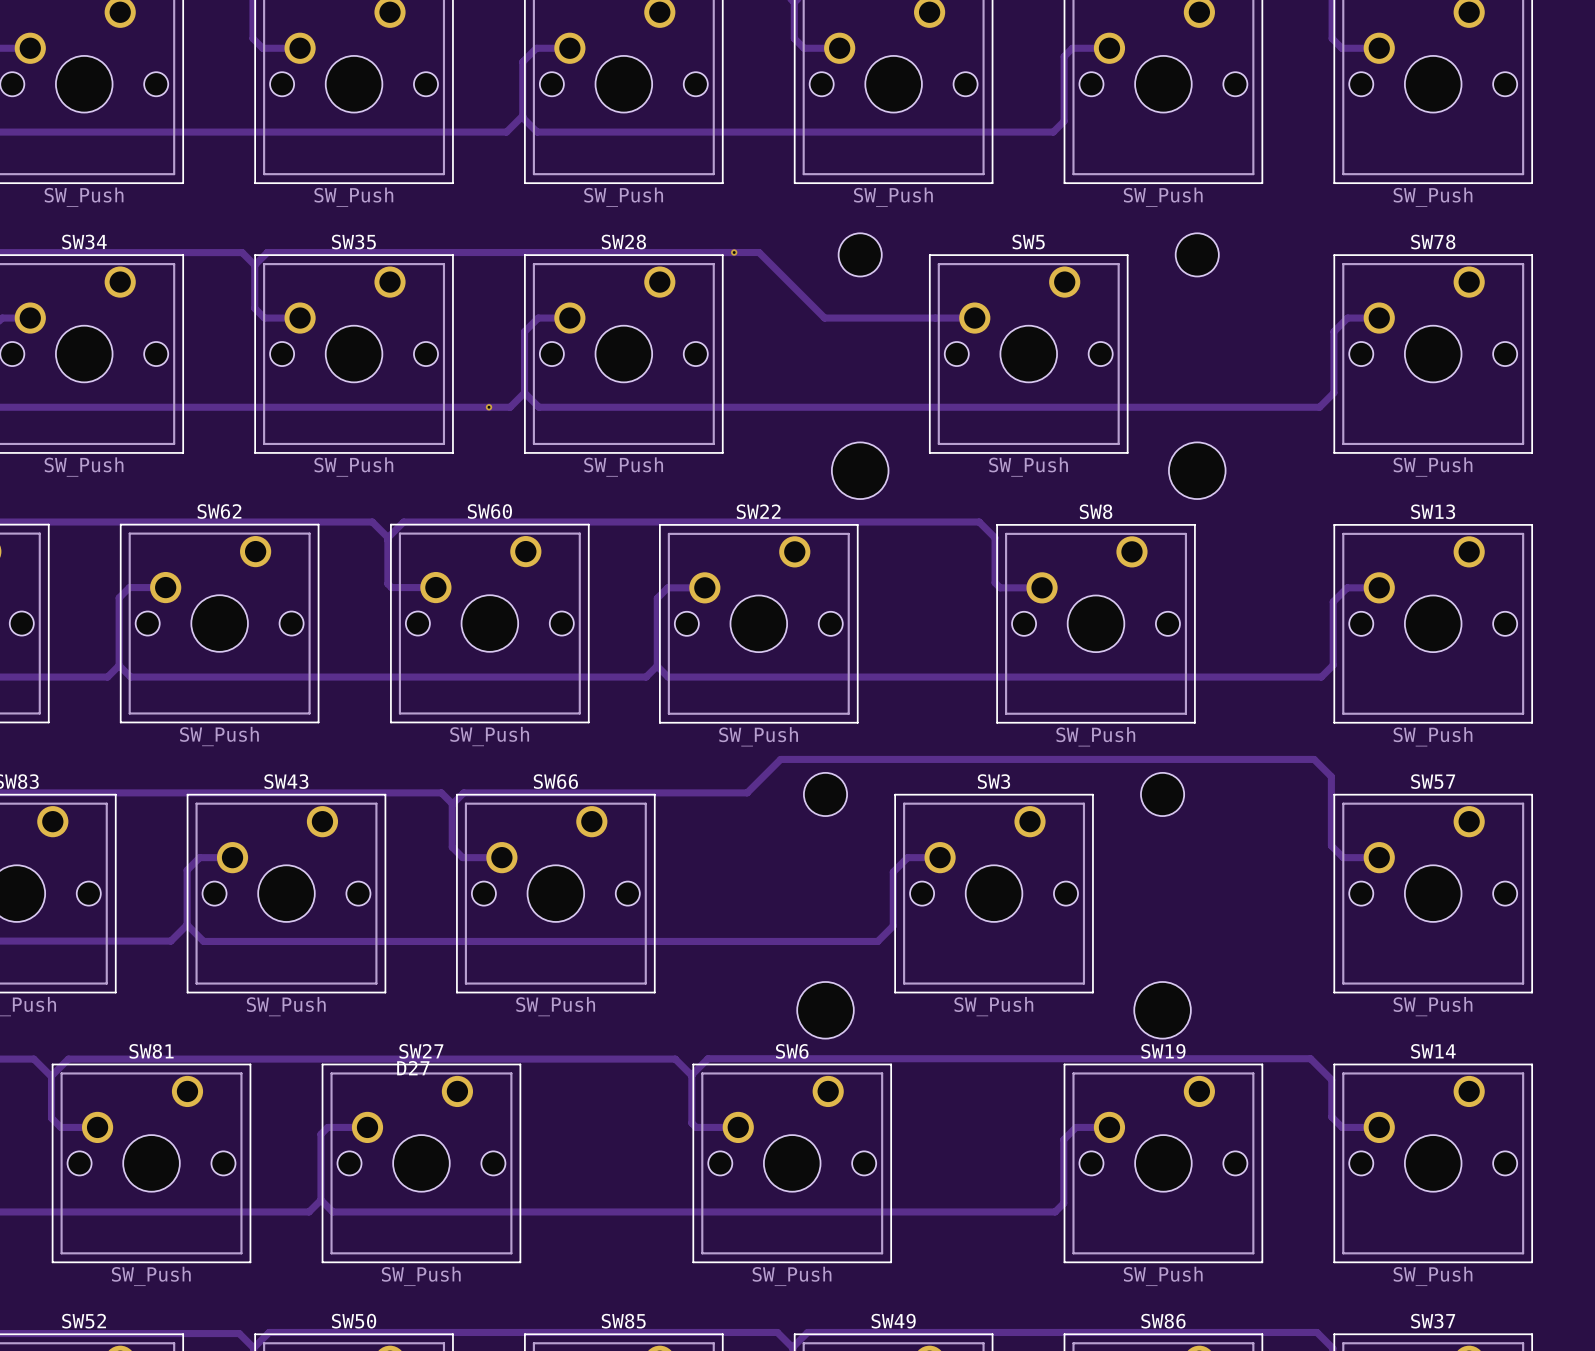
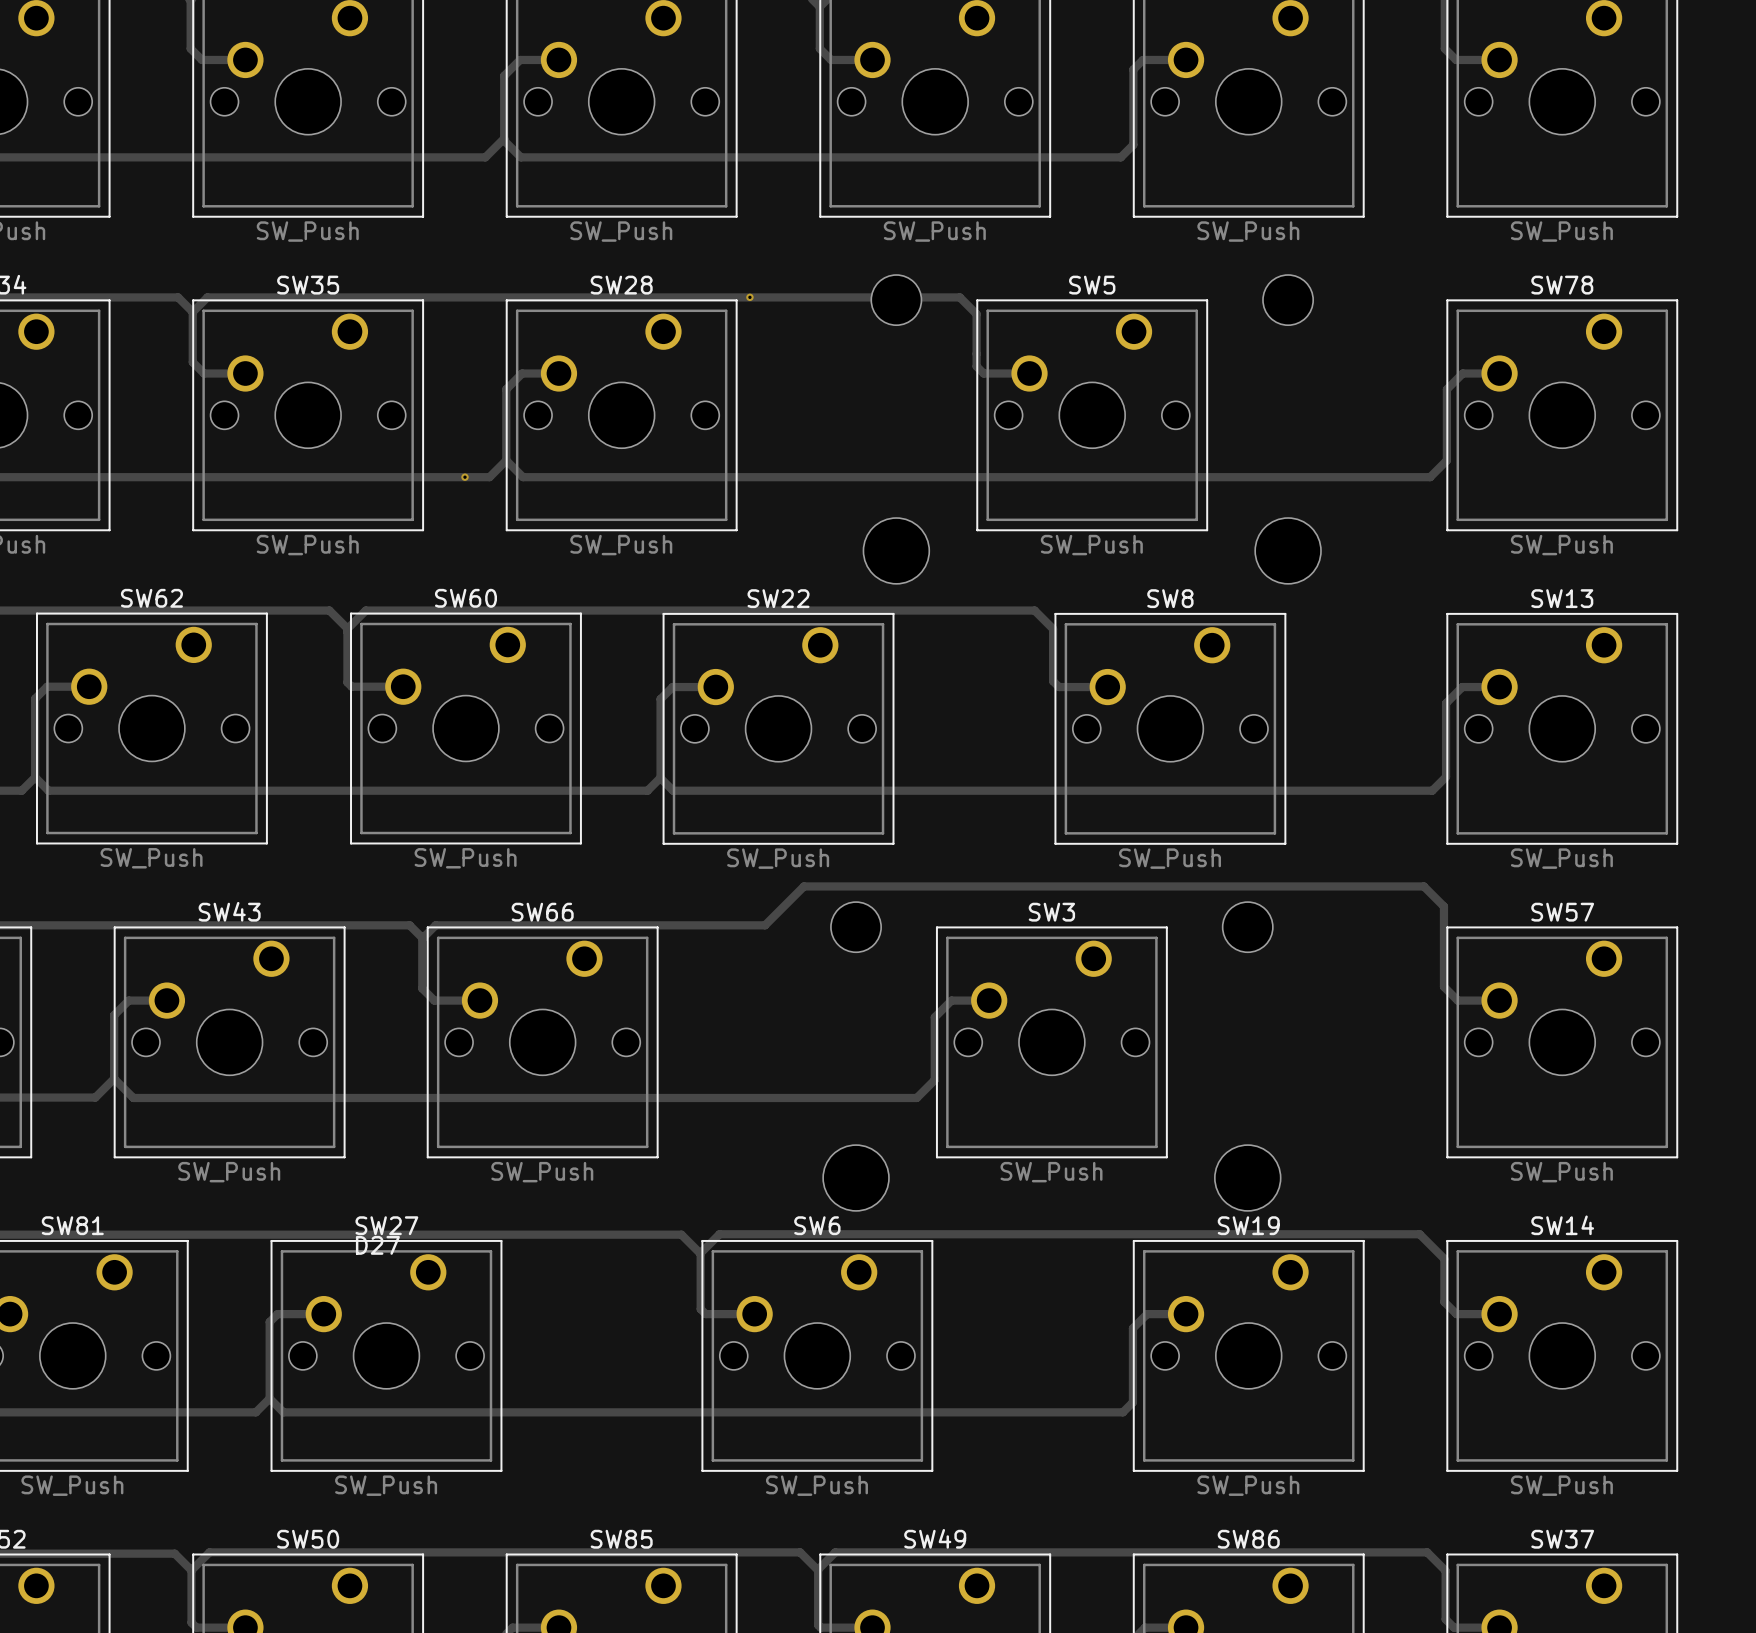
track: (267, 252) (759, 252) (824, 318) (935, 318) -> (207, 297) (959, 297) (976, 314) (976, 366) (983, 373)

